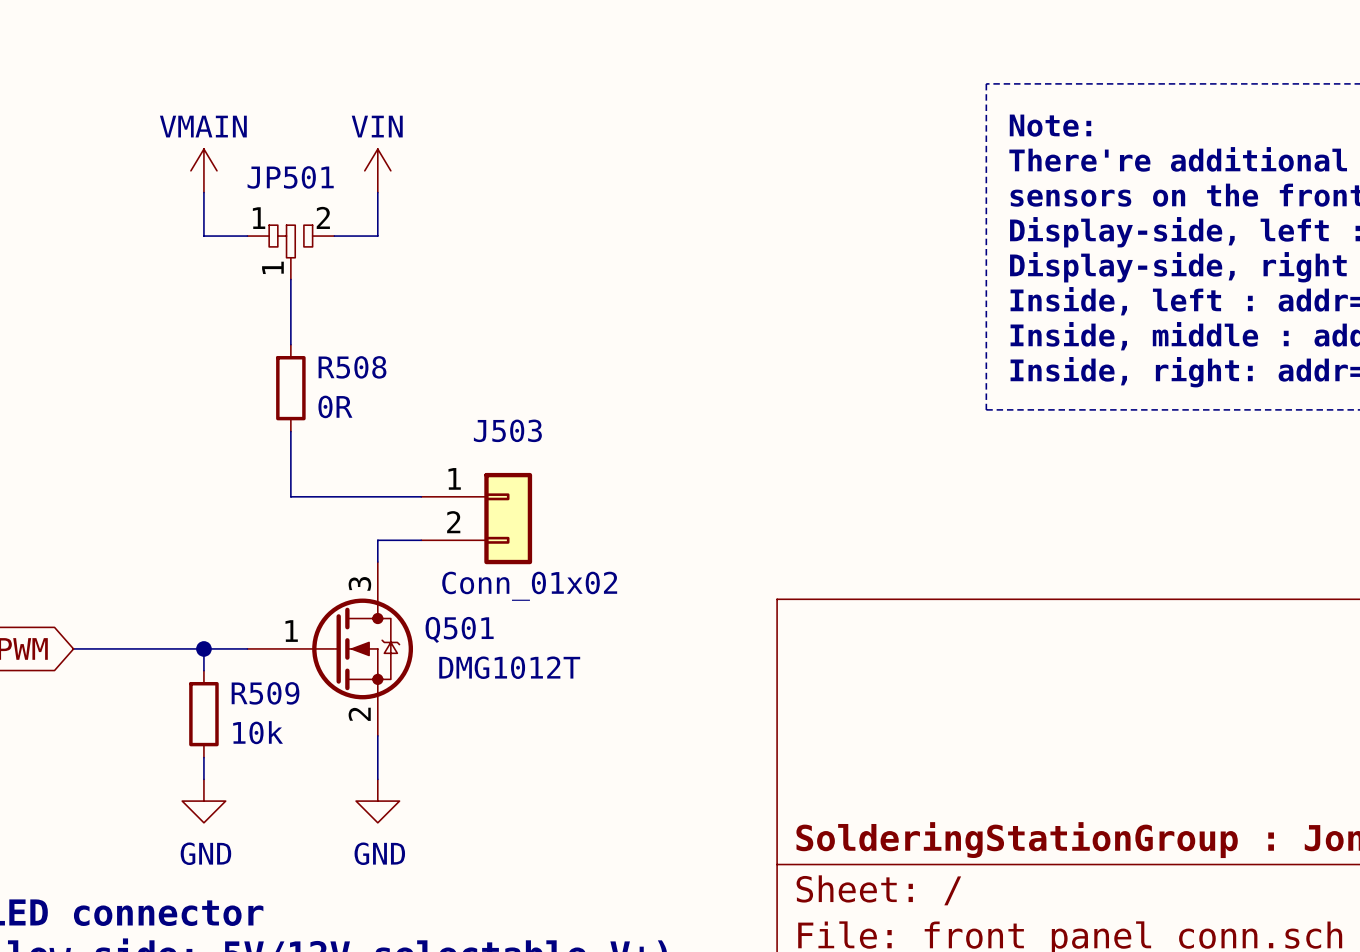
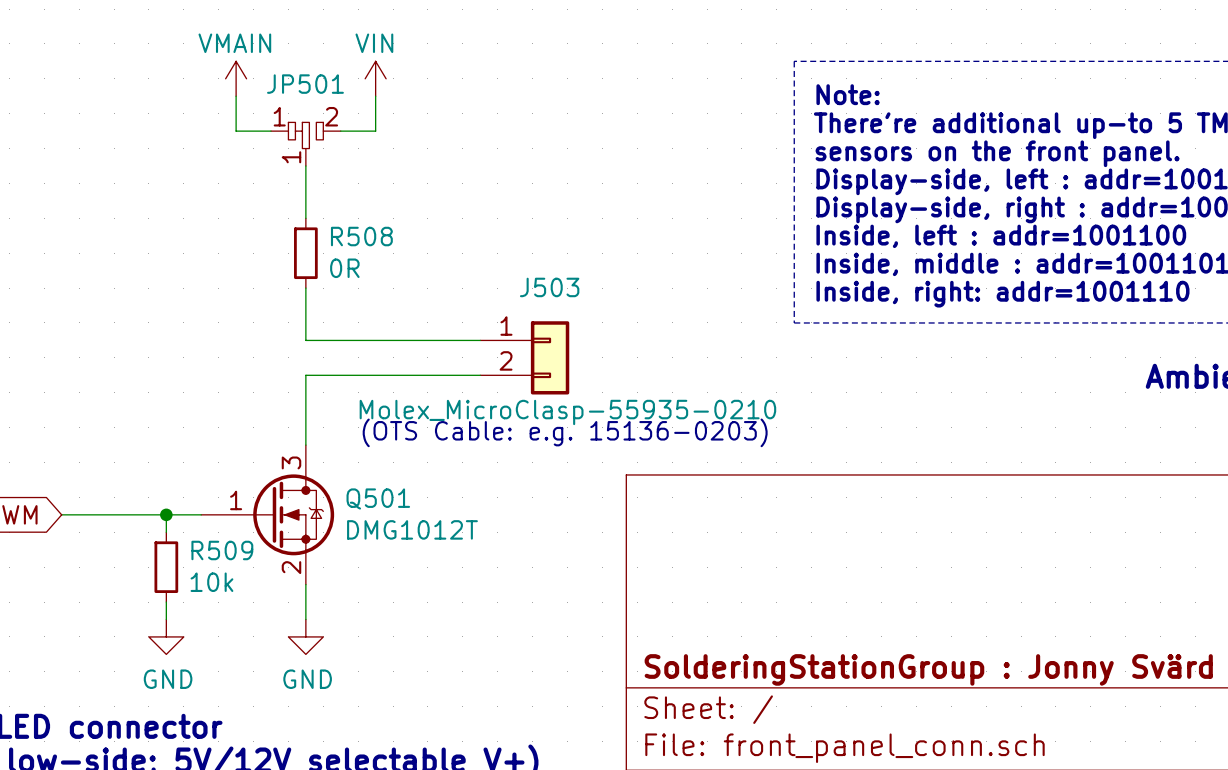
wire: none -> (375, 96) (375, 131) (340, 131)
power symbol position: VMAIN (203, 170) -> VMAIN (236, 78)
power symbol position: VIN (377, 170) -> VIN (375, 78)
wire: (203, 192) (203, 236) (247, 236) -> (236, 96) (236, 131) (270, 131)
wire: (334, 236) (377, 236) -> (305, 218) (305, 183)
JP501 position: (290, 252) -> (305, 144)
wire: (290, 279) (290, 344) -> none
wire: none -> (305, 288) (305, 340) (480, 340)
R508 position: (290, 388) -> (305, 253)
wire: (290, 431) (290, 496) (421, 496) -> none
J503 position: (476, 518) -> (524, 357)
wire: (377, 540) (421, 540) -> (305, 427) (305, 375) (480, 375)
text: none -> (OTS Cable: e.g. 15136-0203) (565, 432)
J503 value: Conn_01x02 (529, 586) -> Molex_MicroClasp-55935-0210 (567, 412)

